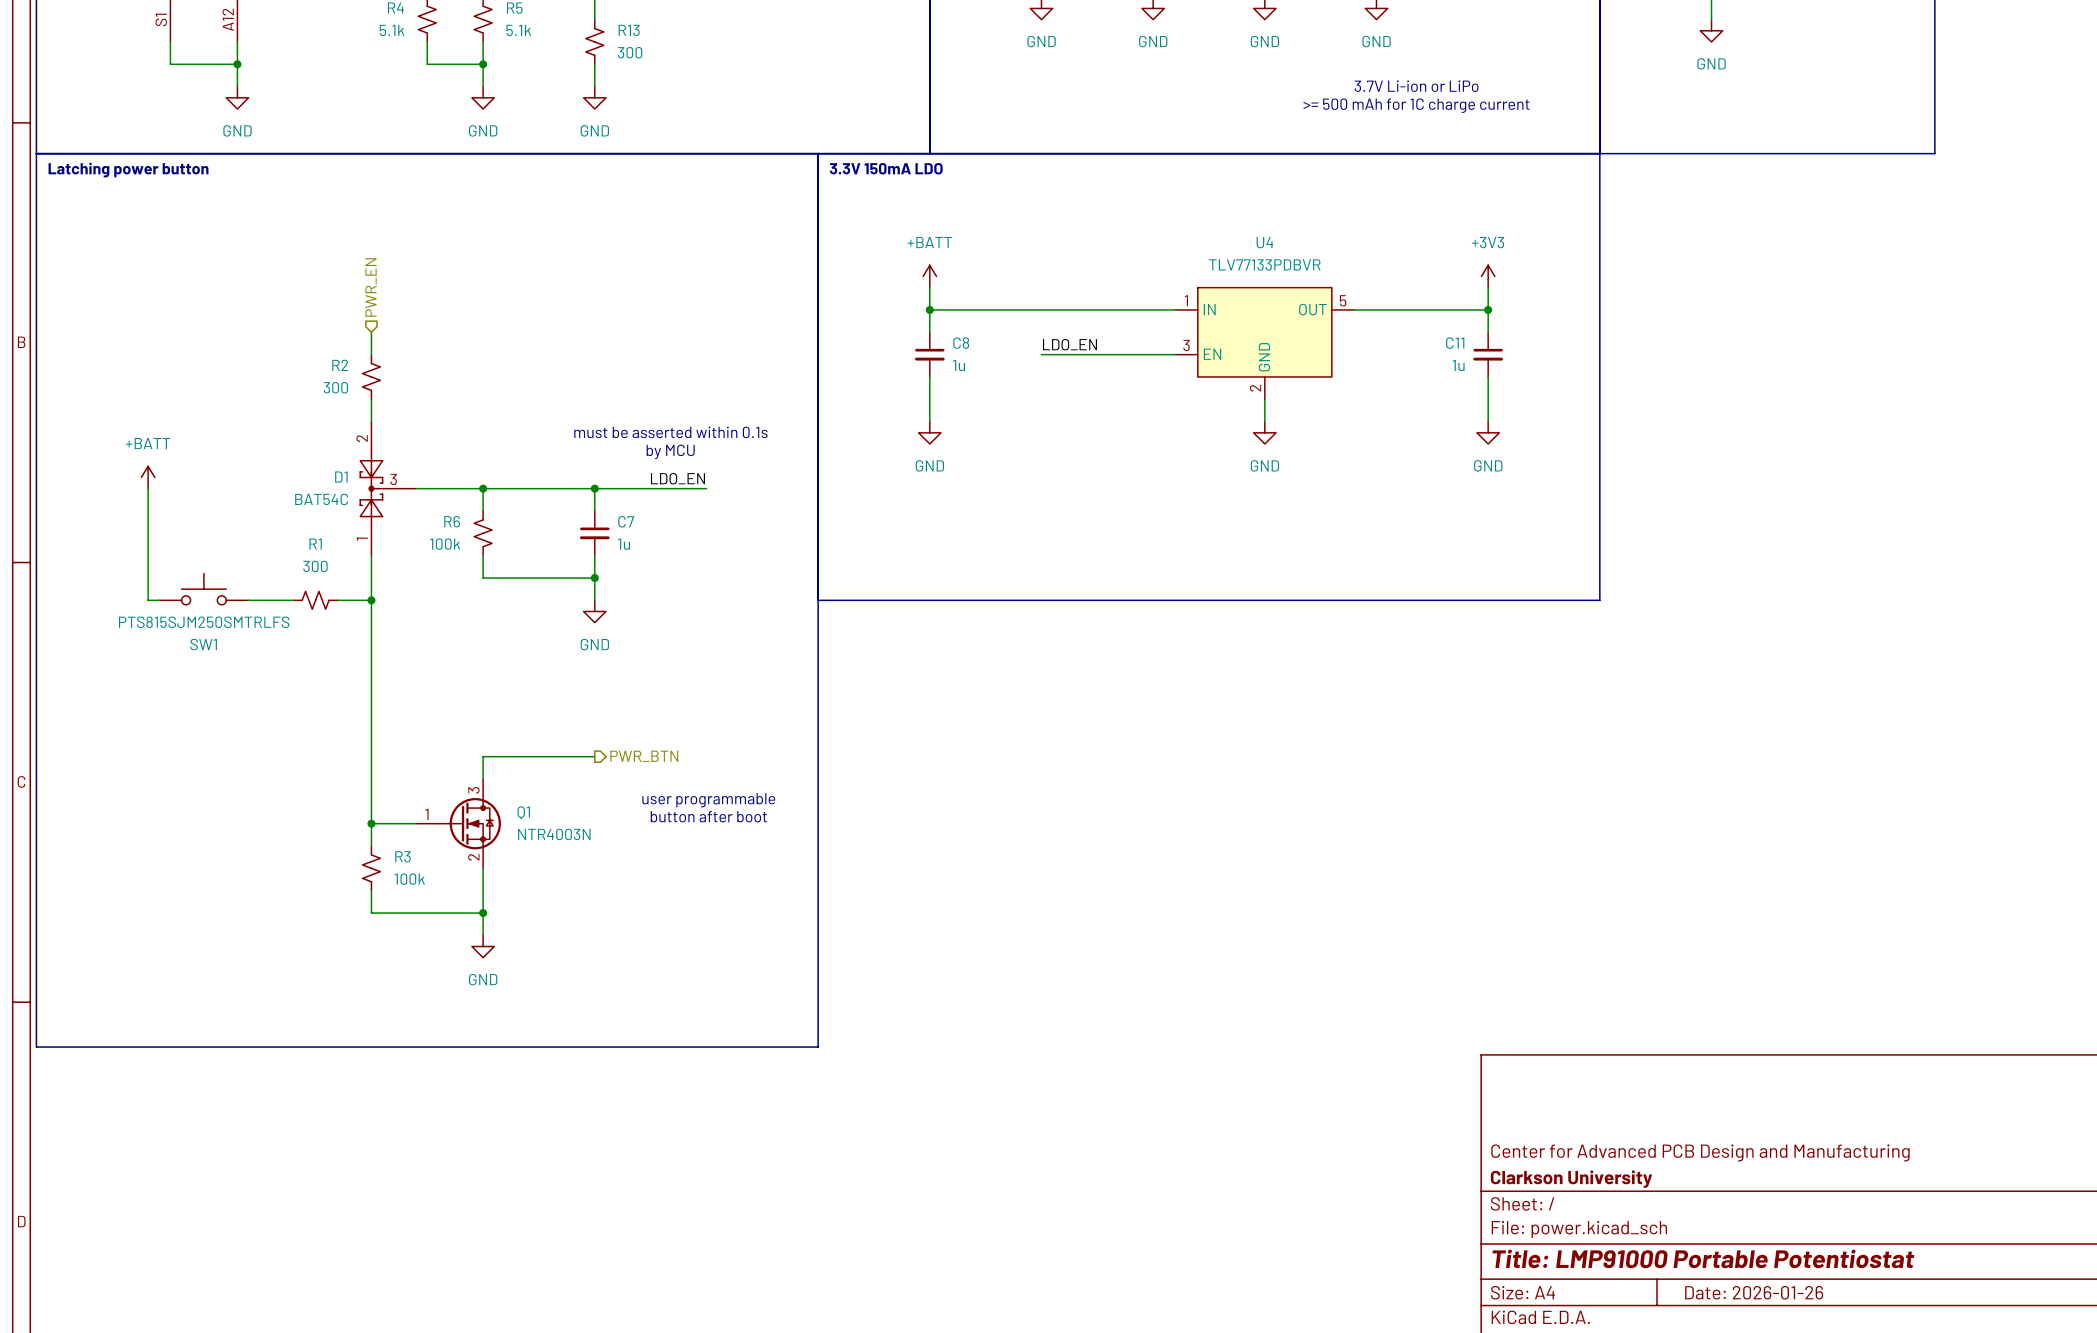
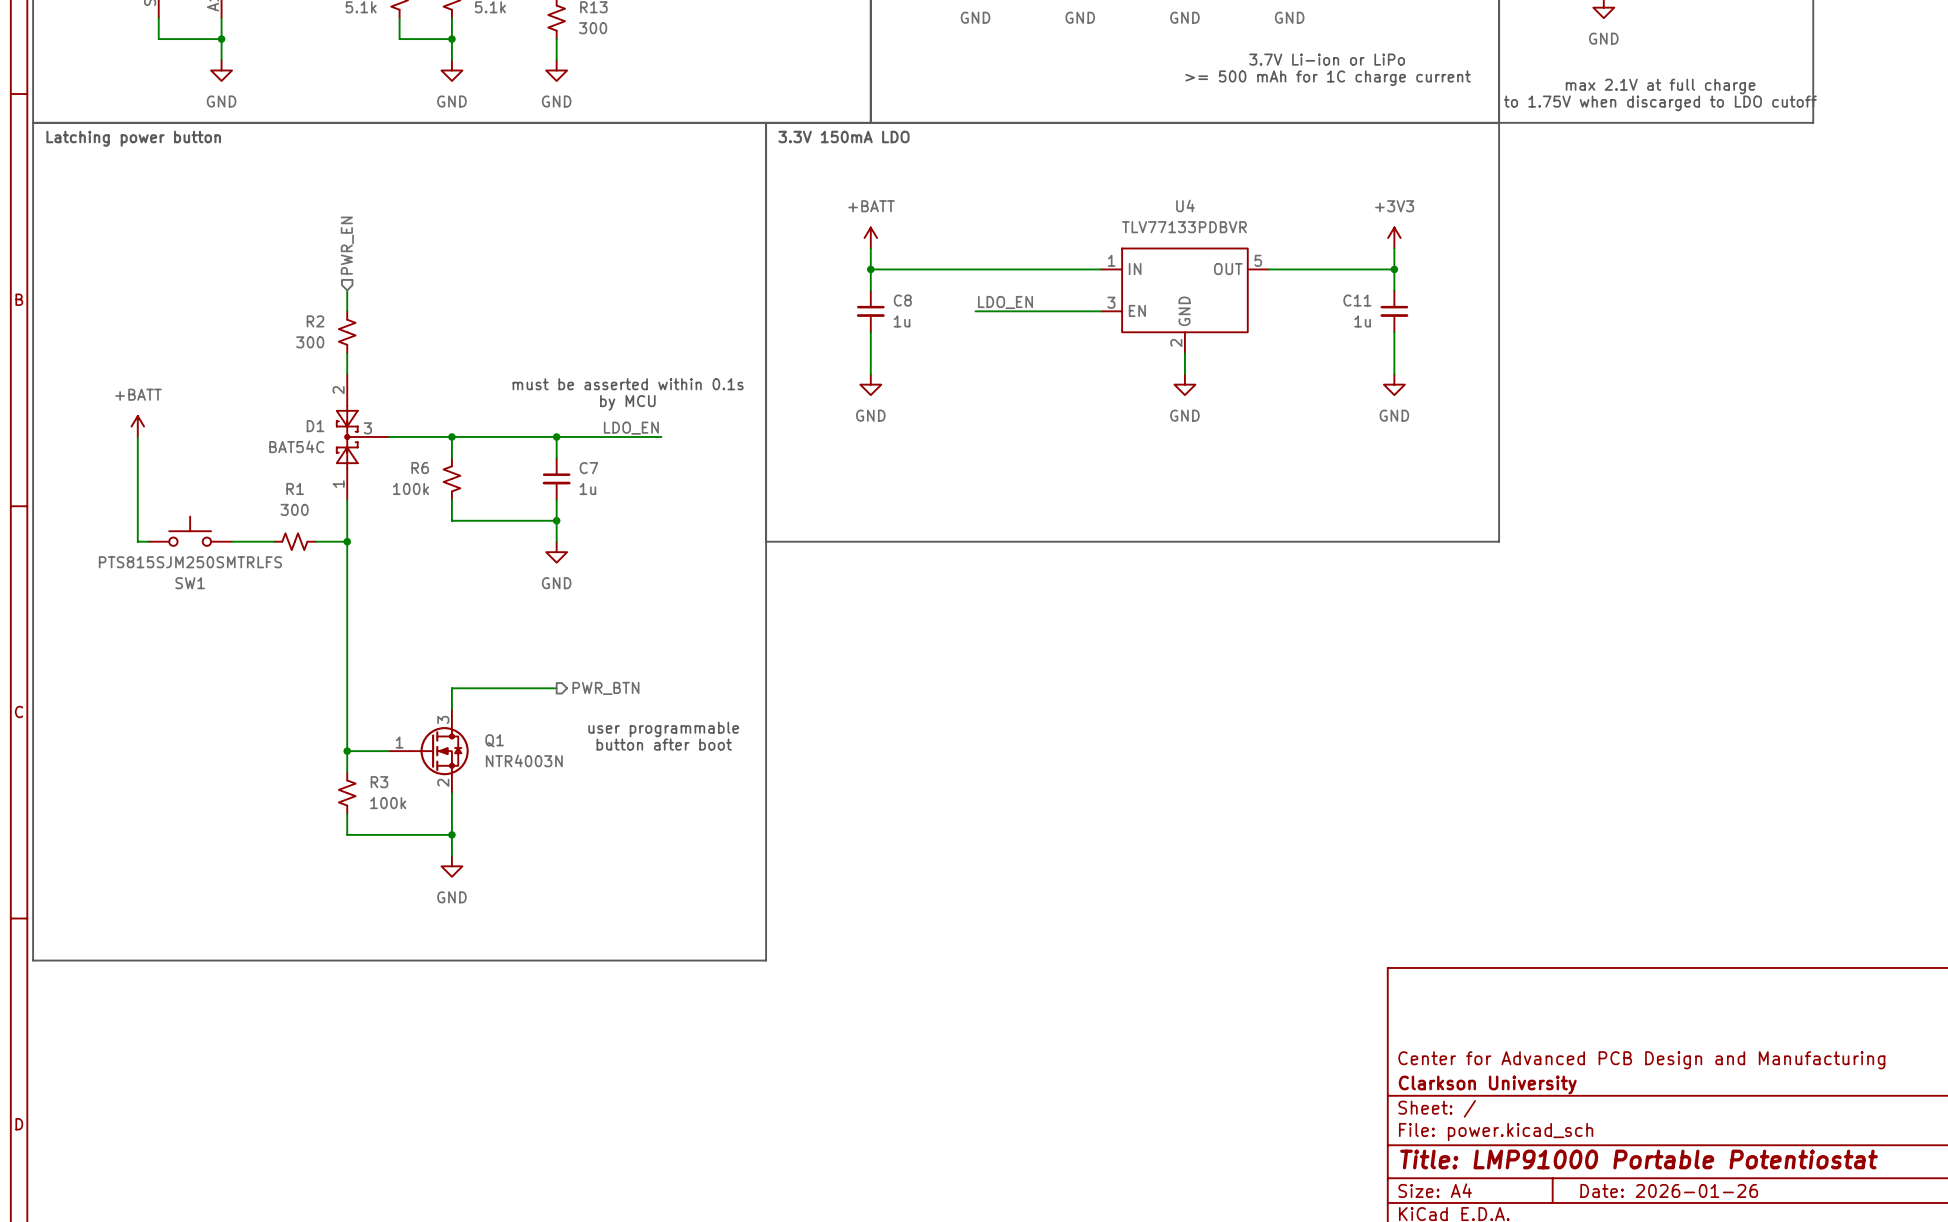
text: none -> max 2.1V at full charge (1660, 86)
text: none -> to 1.75V when discarged to LDO cutoff (1660, 103)

